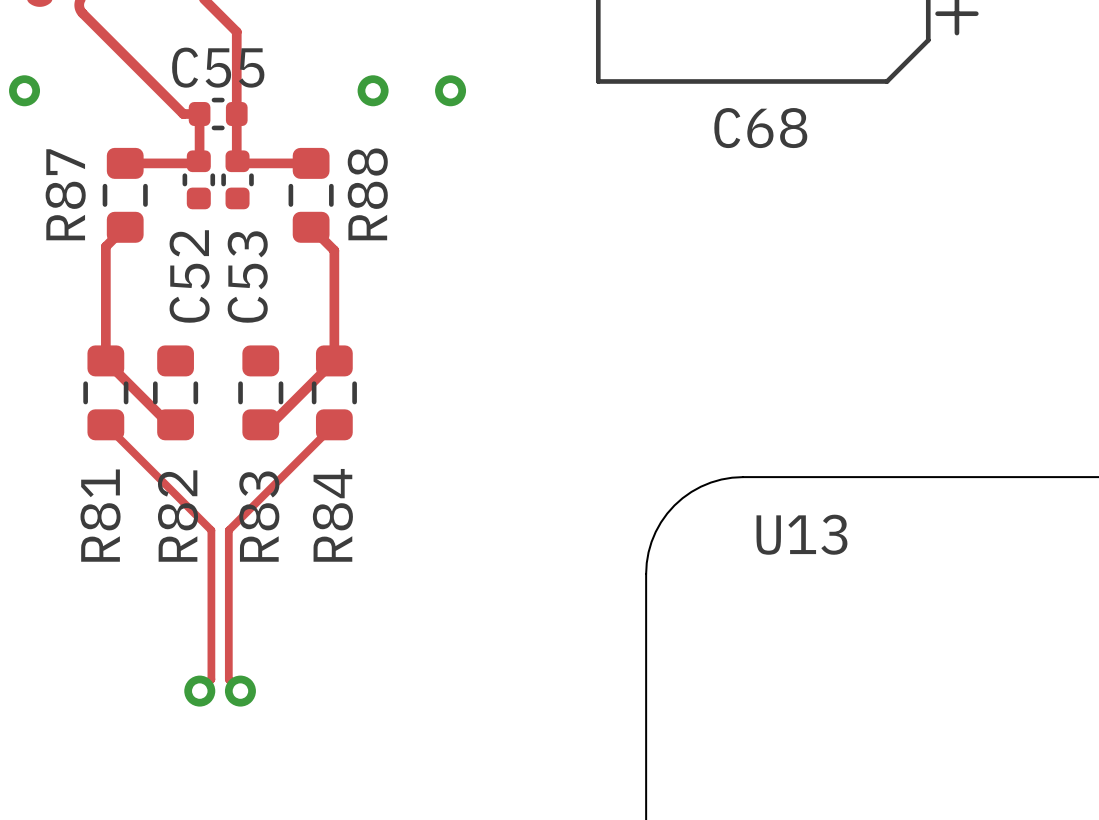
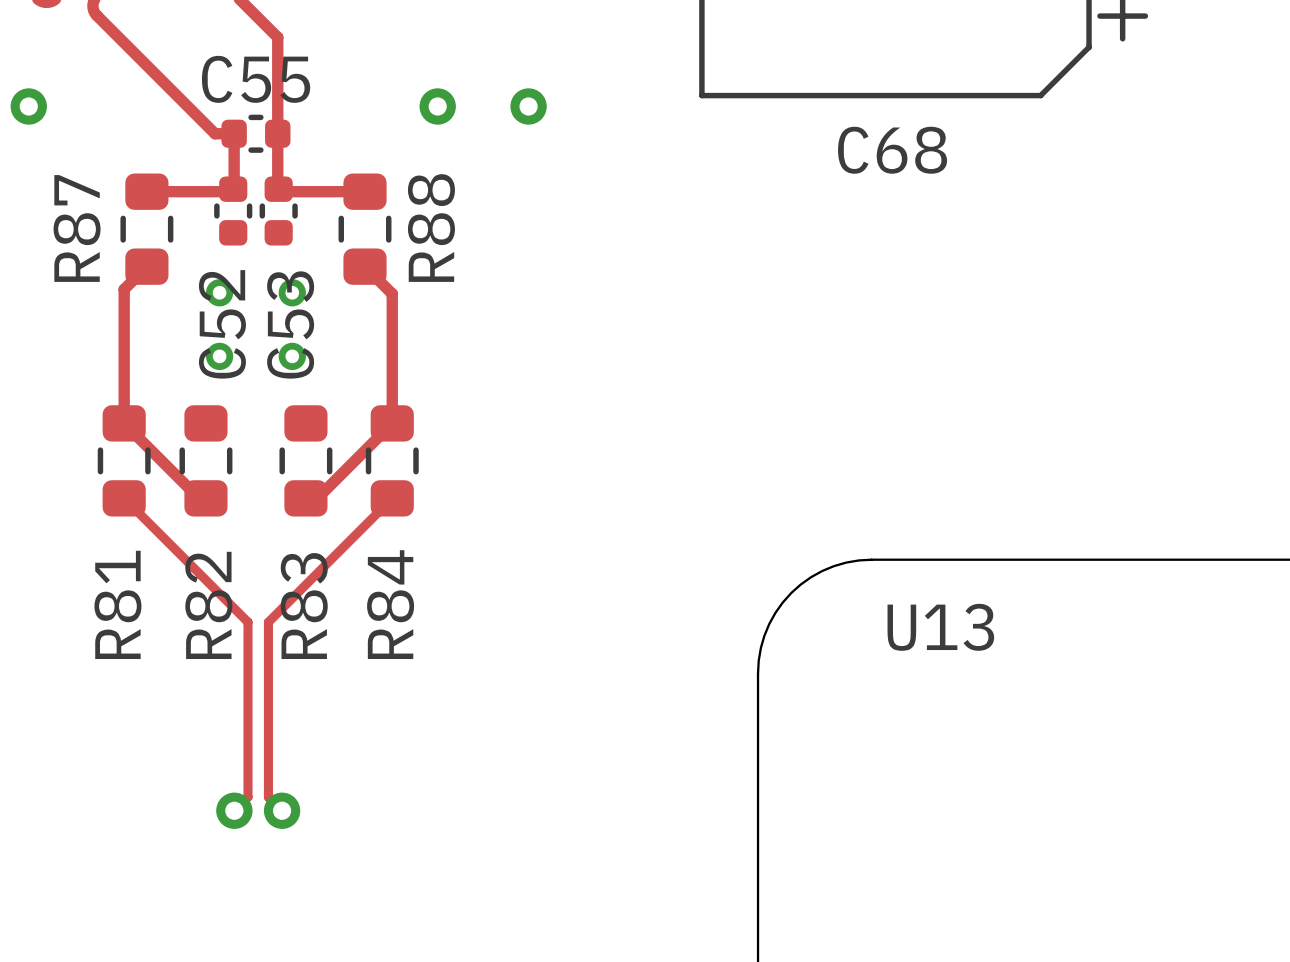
via: none -> (219, 292)
via: none -> (292, 292)
via: none -> (219, 356)
via: none -> (292, 356)

